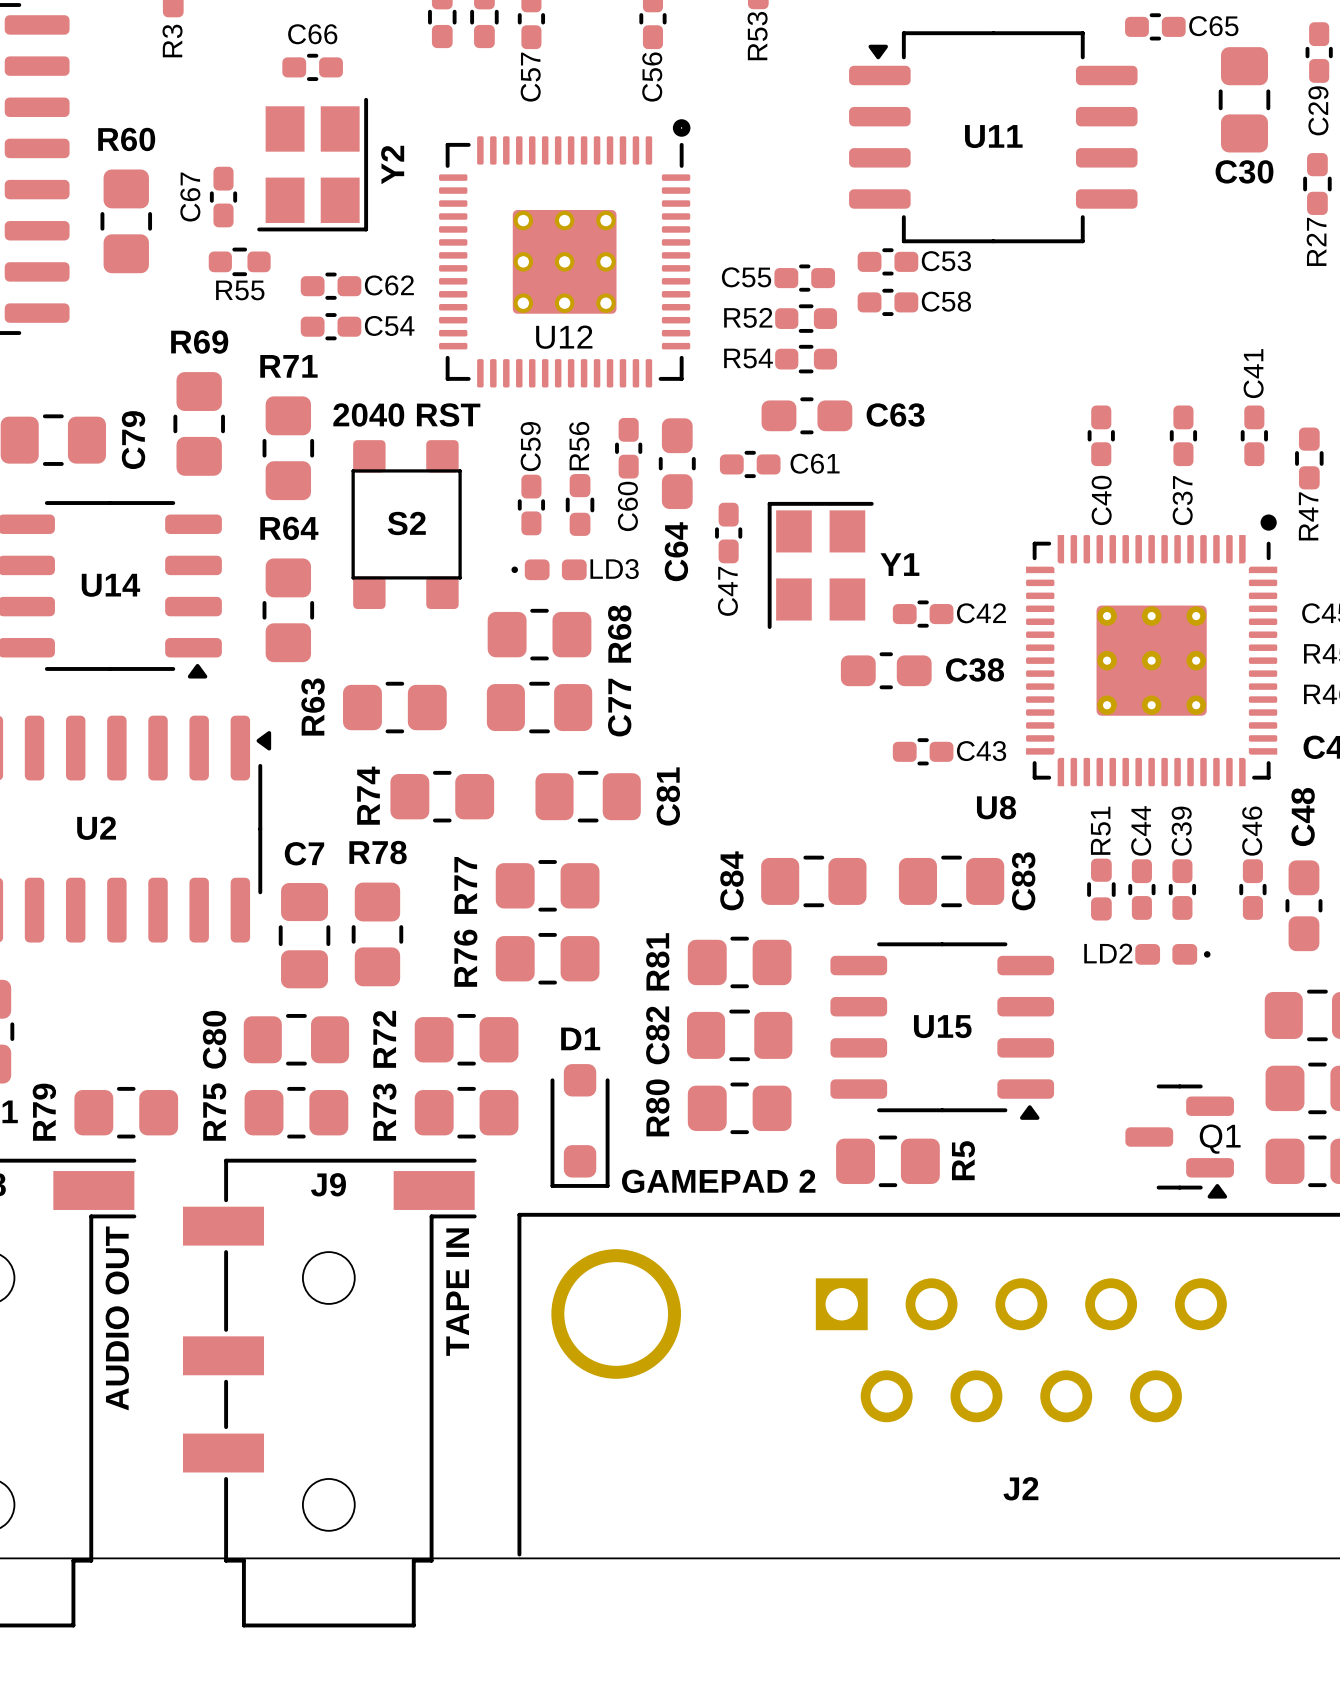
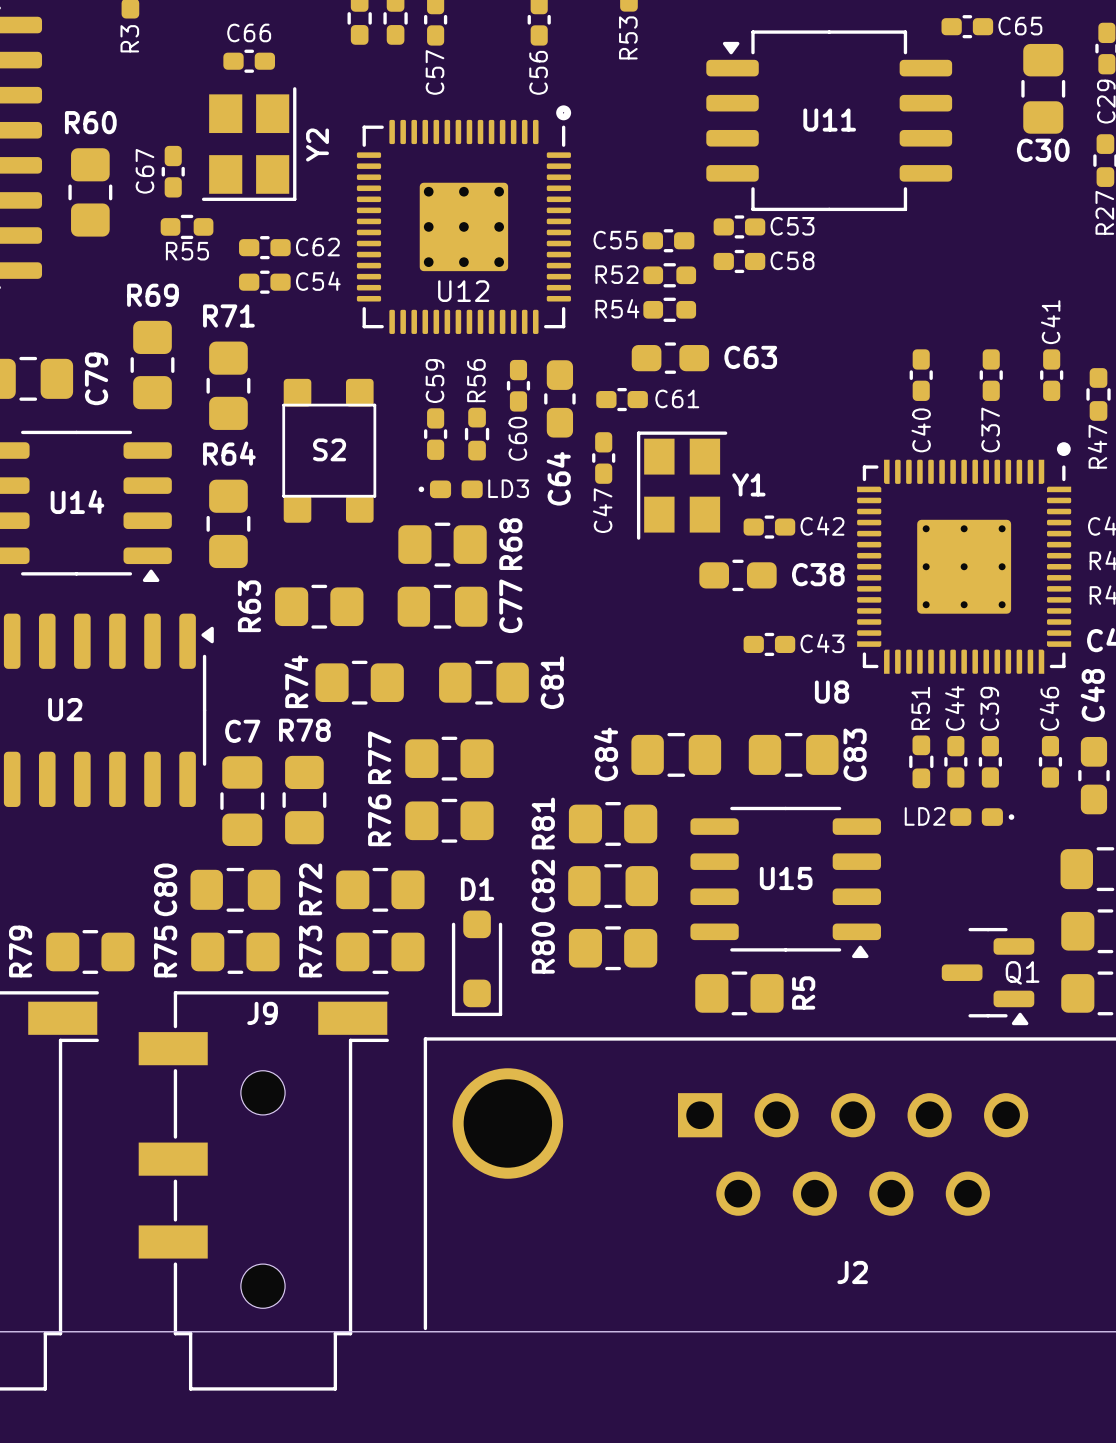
text: 2040 RST (406, 414) -> none
text: GAMEPAD 2 (718, 1181) -> none
text: TAPE IN (457, 1292) -> none
text: AUDIO OUT (117, 1318) -> none

